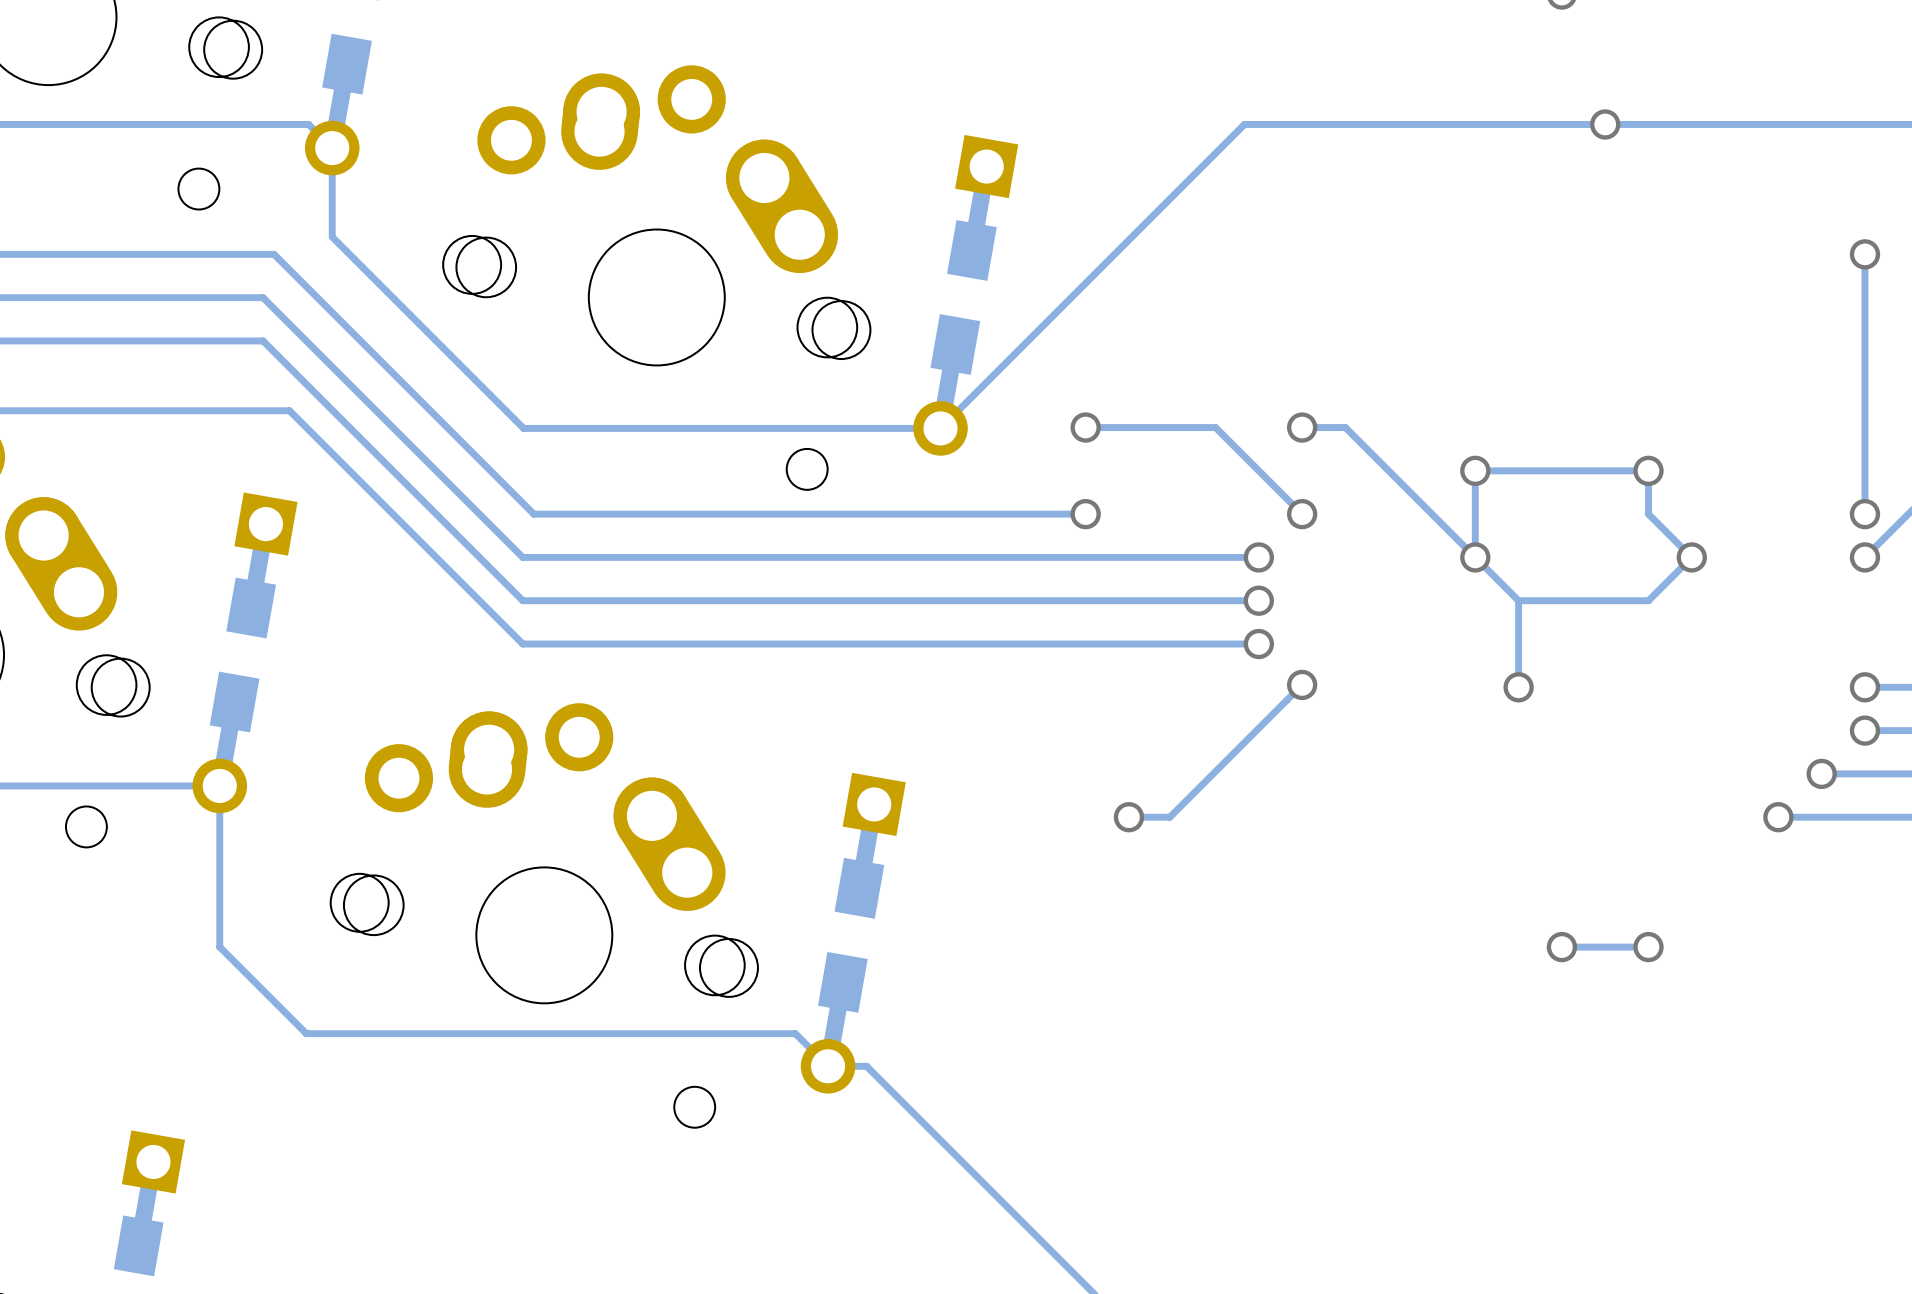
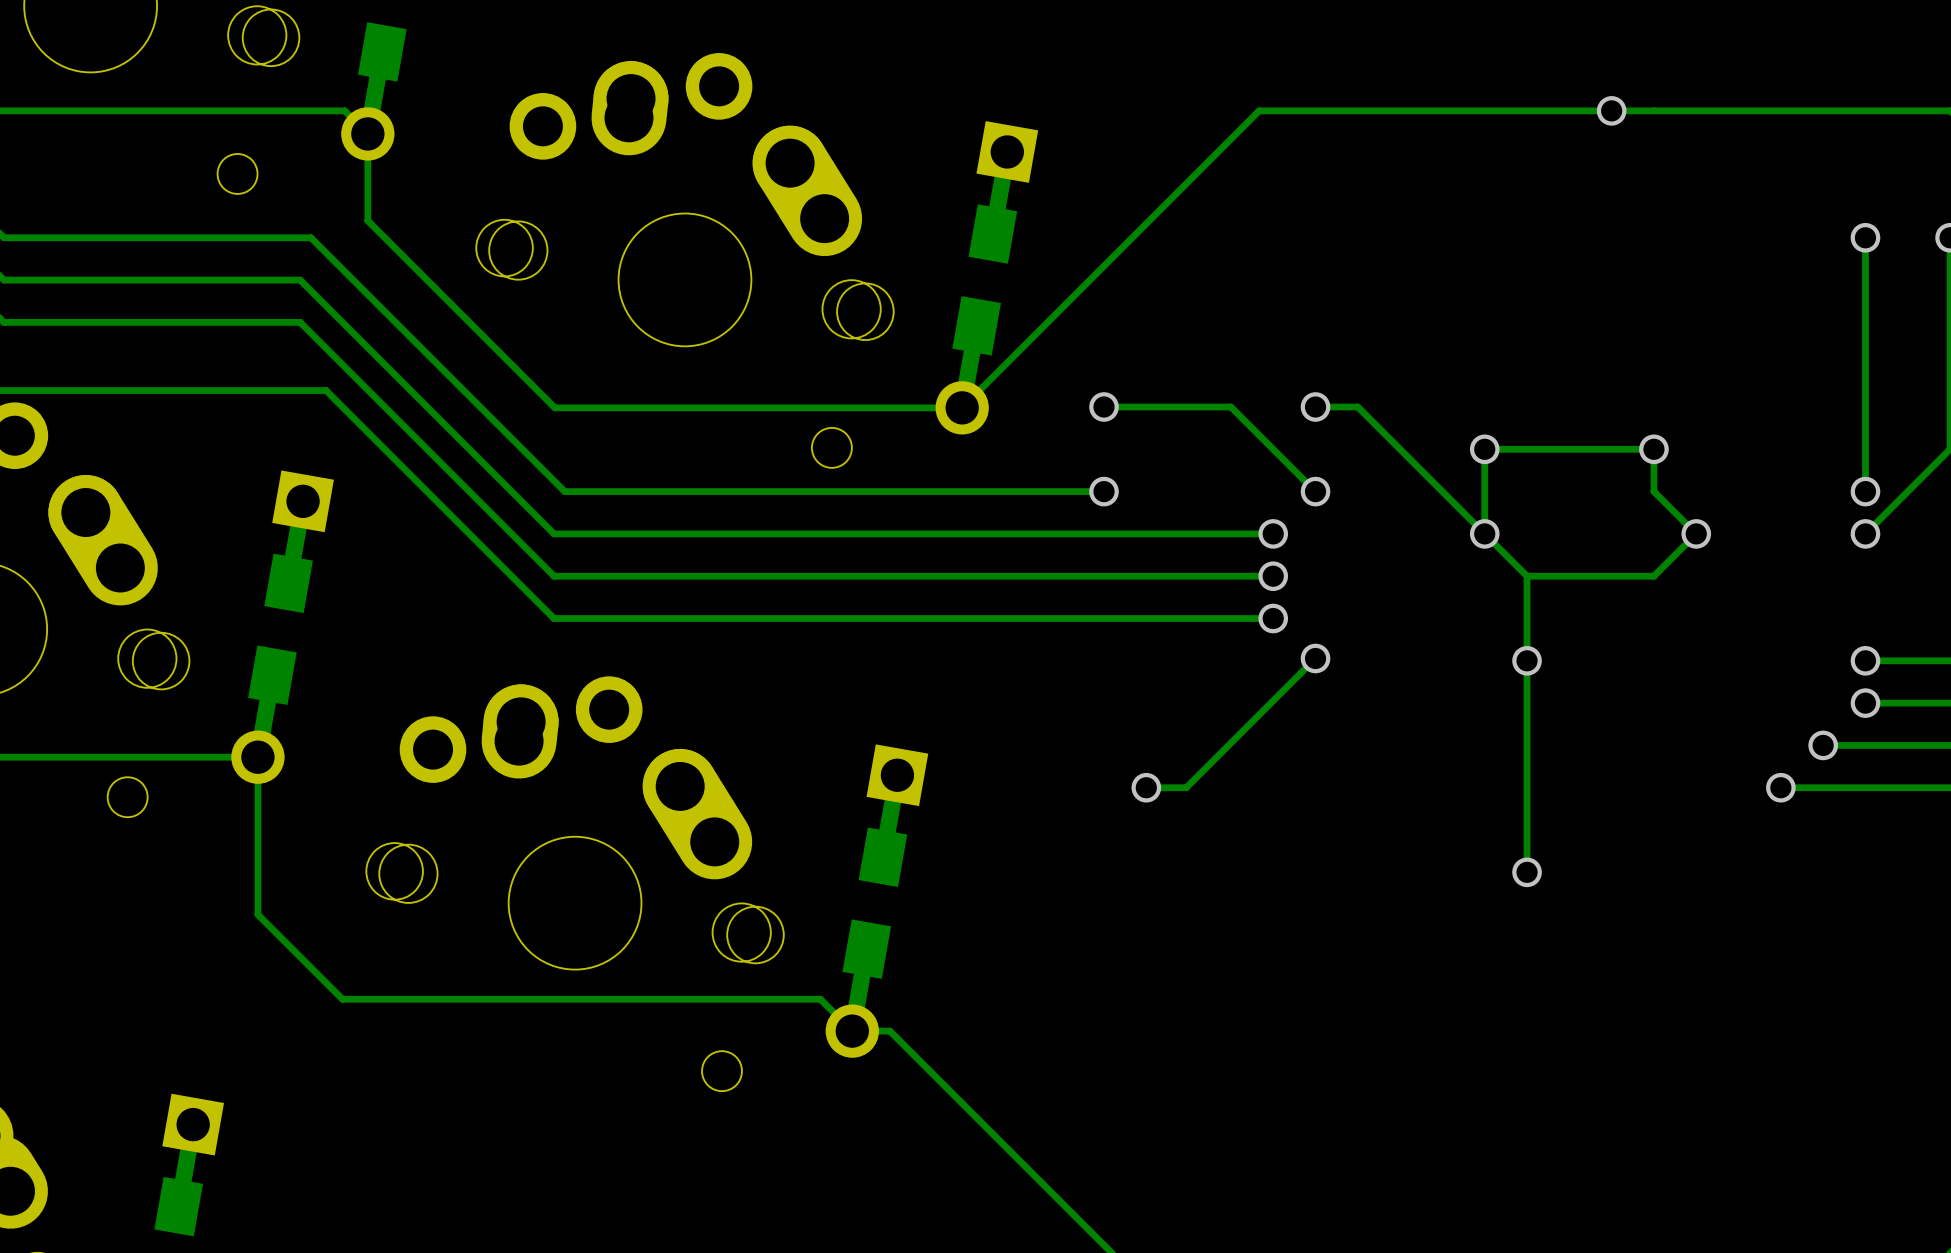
track: none -> (1527, 660) (1527, 872)
via position: (1561, 947) -> (1527, 872)
track: (1648, 947) (1561, 947) -> none
via: (1648, 947) -> none

